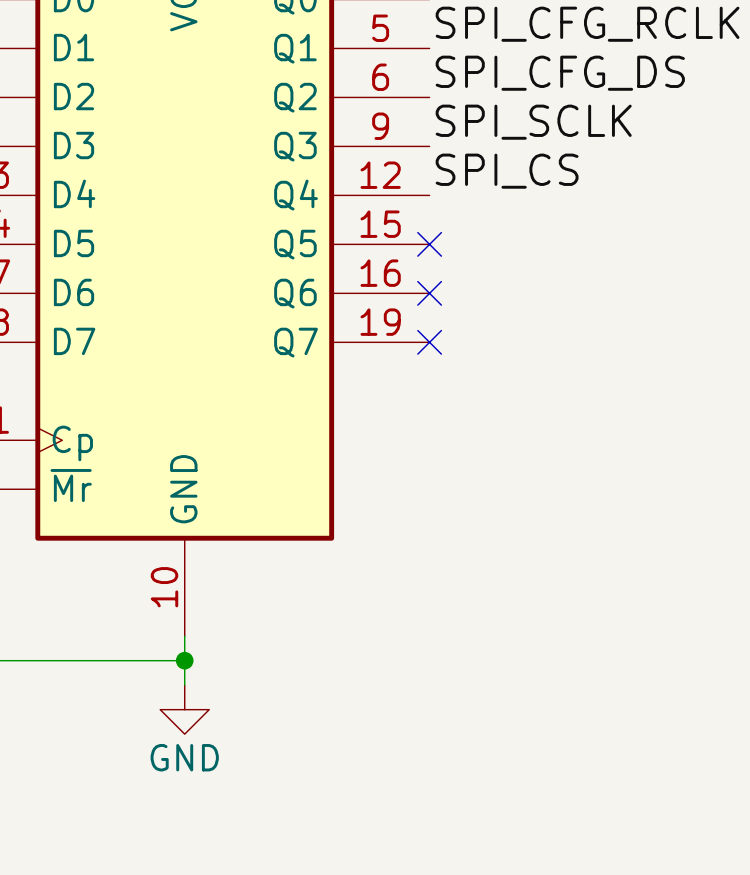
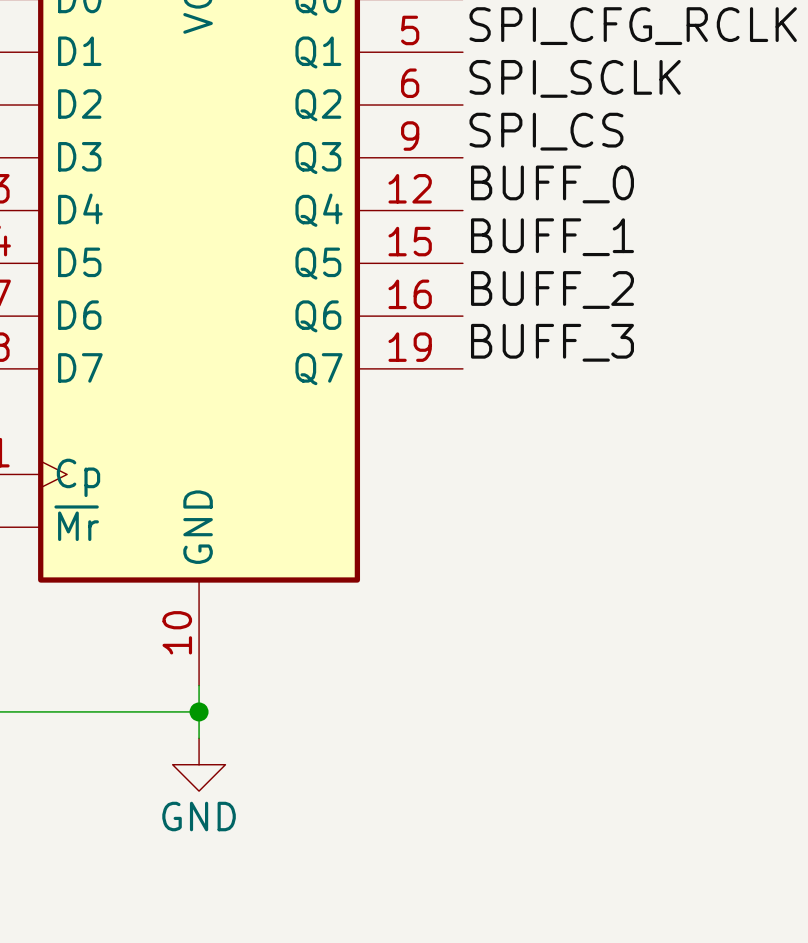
label: SPI_CFG_DS (560, 73) -> SPI_SCLK (575, 78)
label: SPI_SCLK (533, 122) -> SPI_CS (546, 131)
label: SPI_CS (507, 171) -> BUFF_0 (552, 184)
label: none -> BUFF_1 (552, 237)
no-connect mark: (429, 244) -> none
label: none -> BUFF_2 (552, 290)
no-connect mark: (429, 293) -> none
label: none -> BUFF_3 (552, 342)
no-connect mark: (429, 342) -> none

